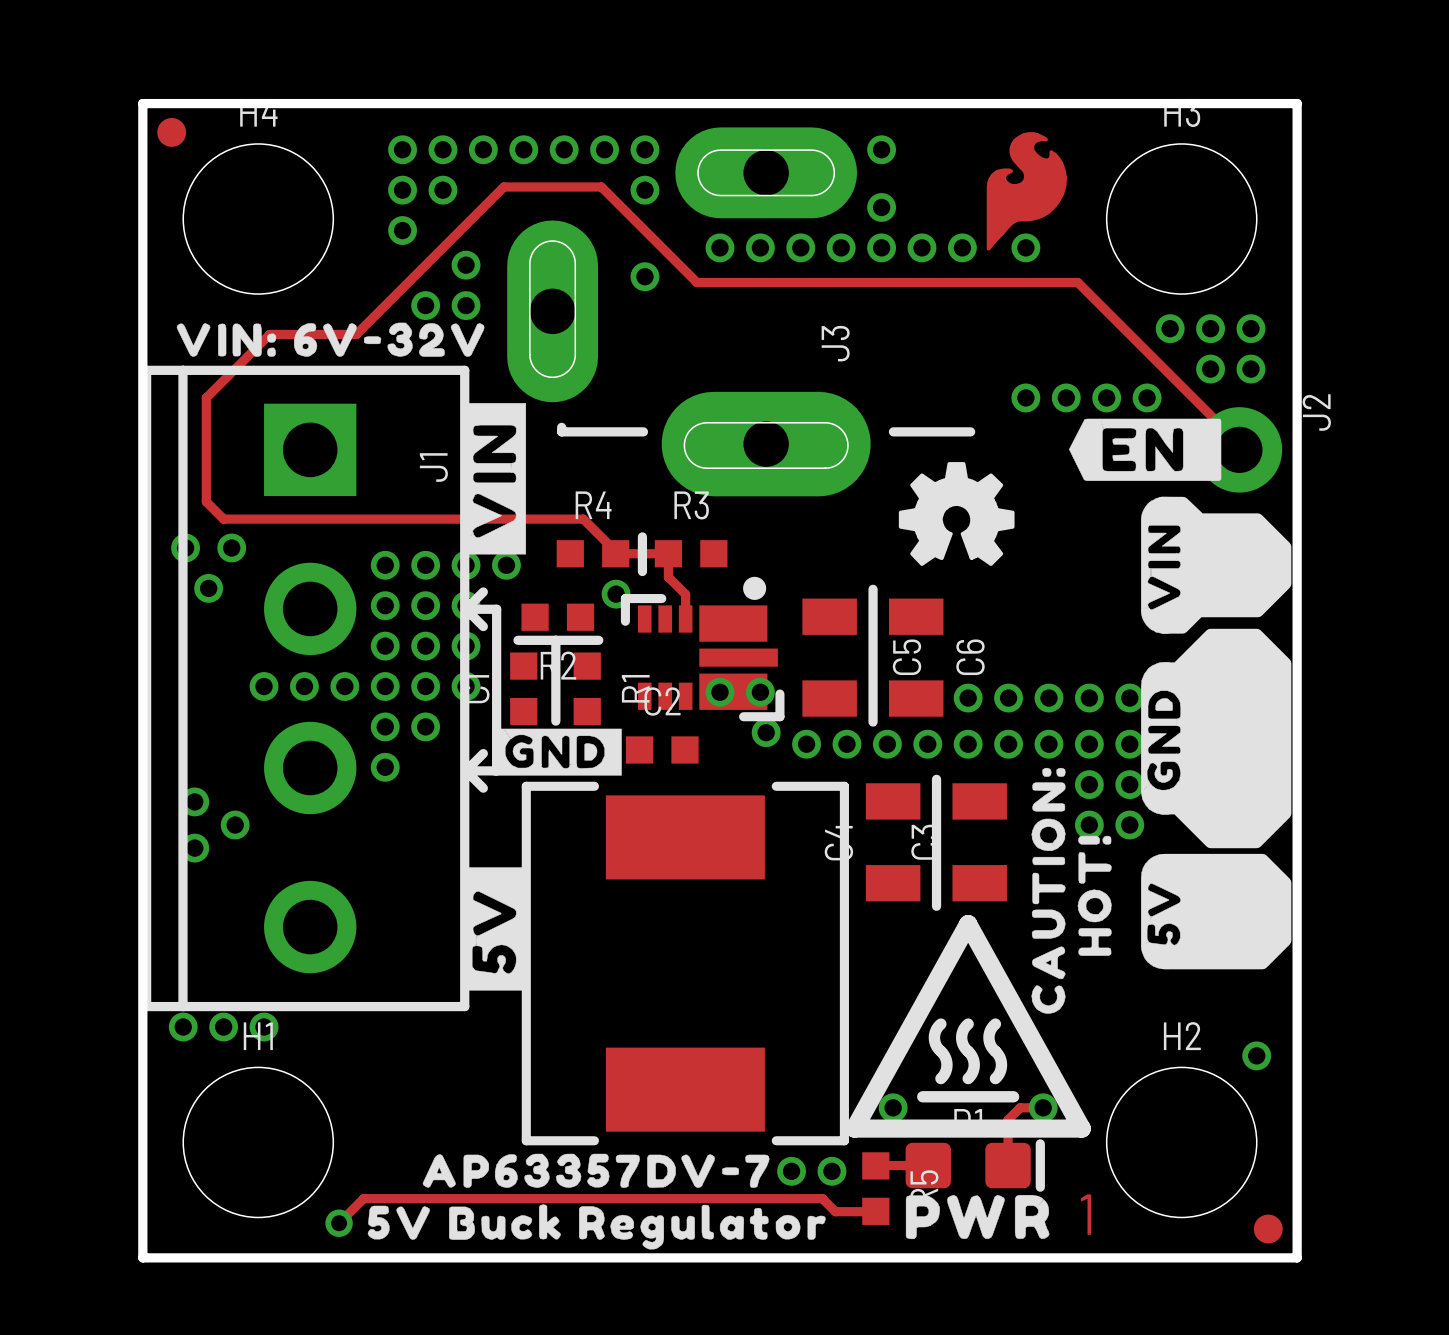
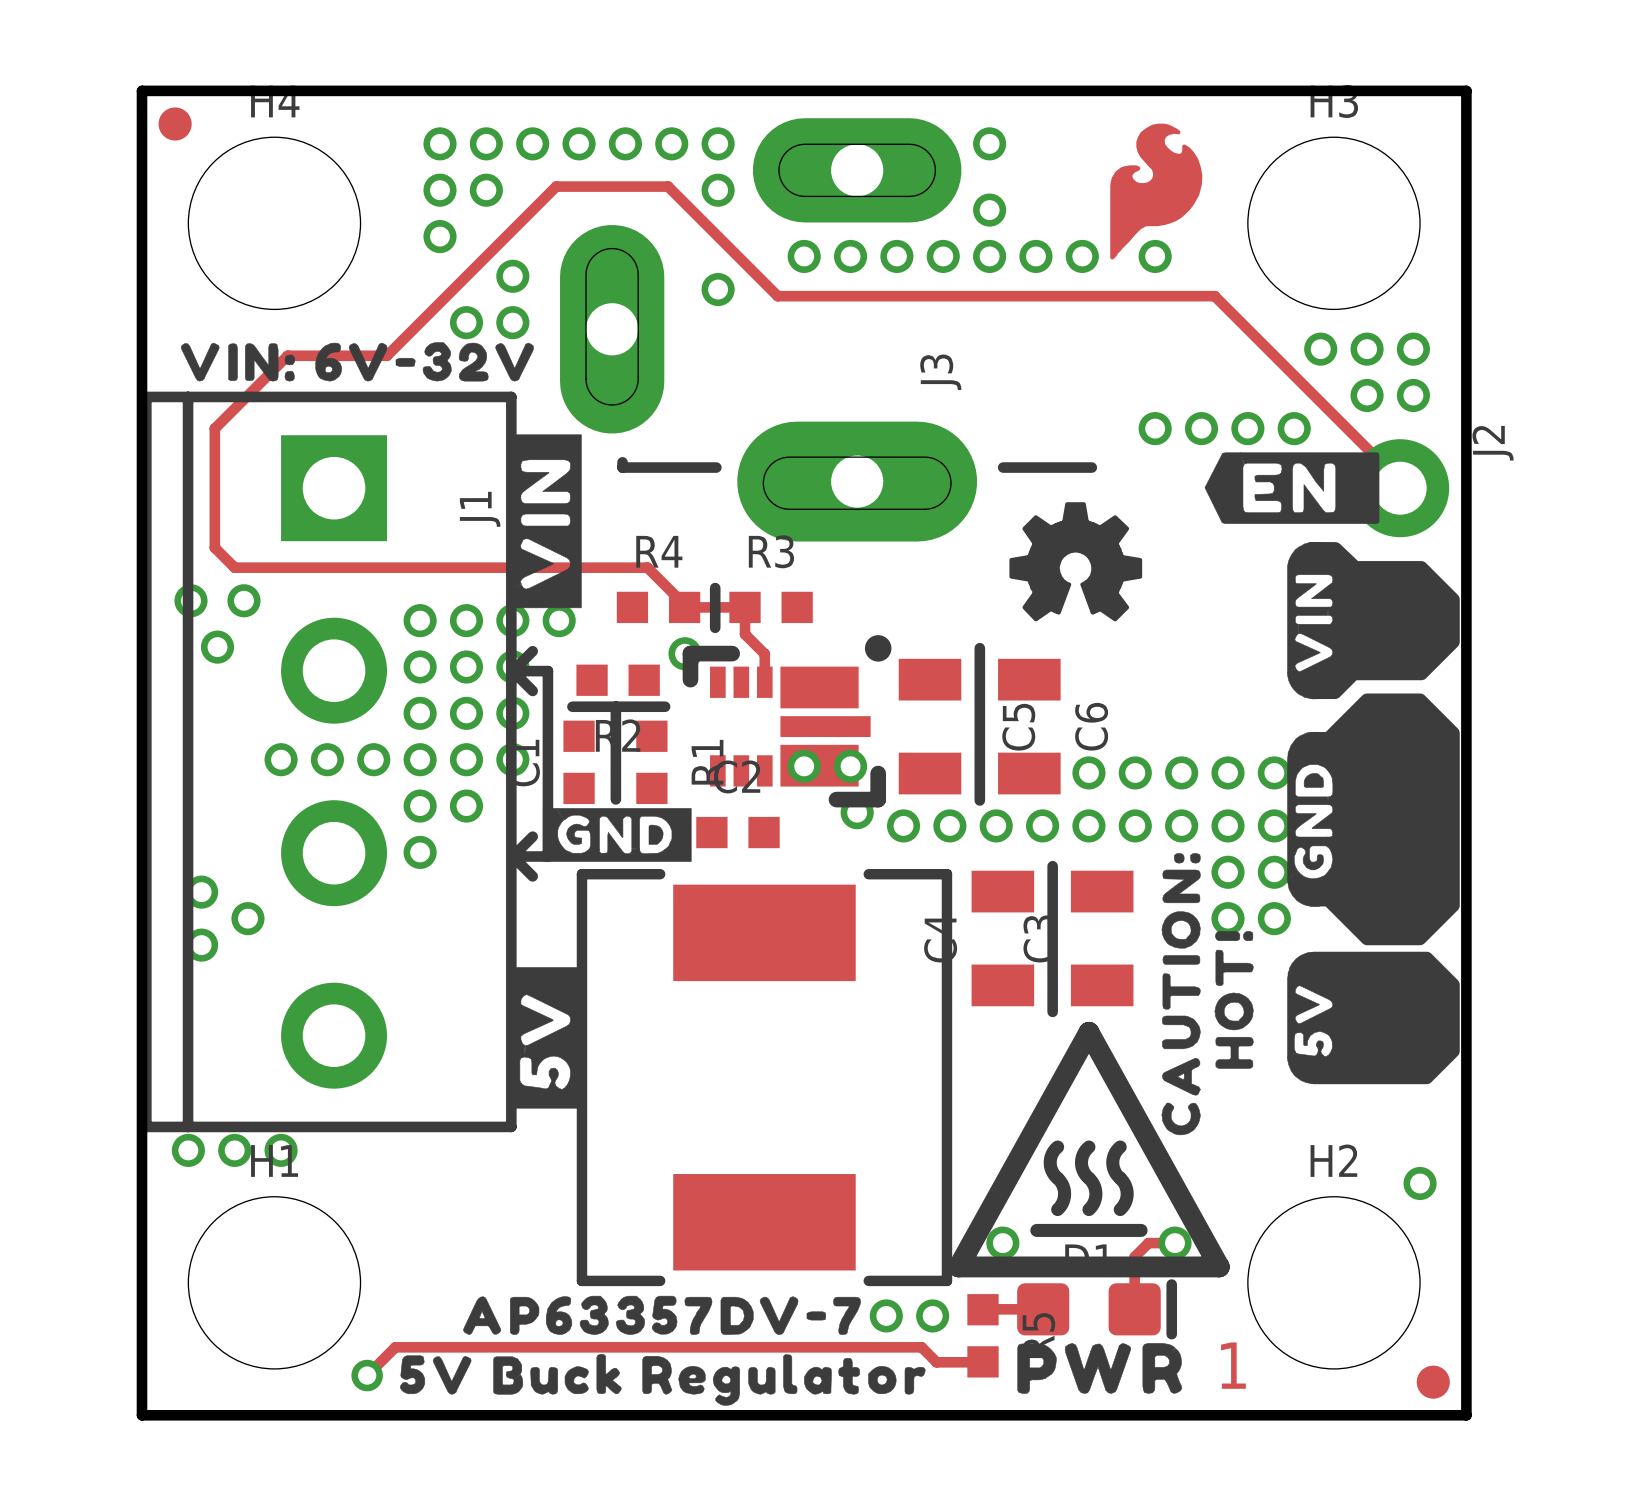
part footprint: [620, 576, 785, 722] -> [682, 635, 892, 808]

